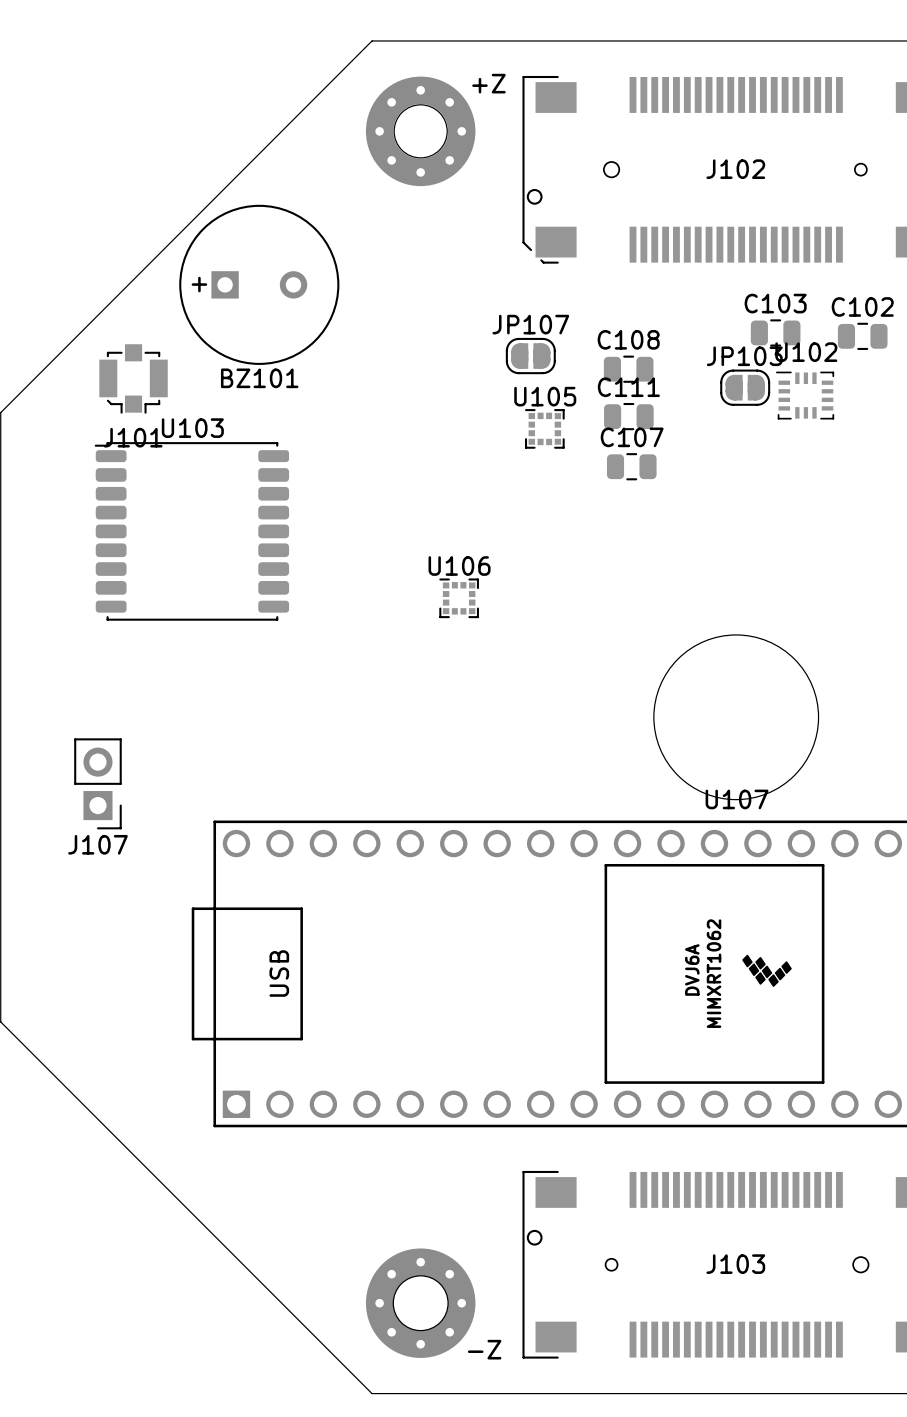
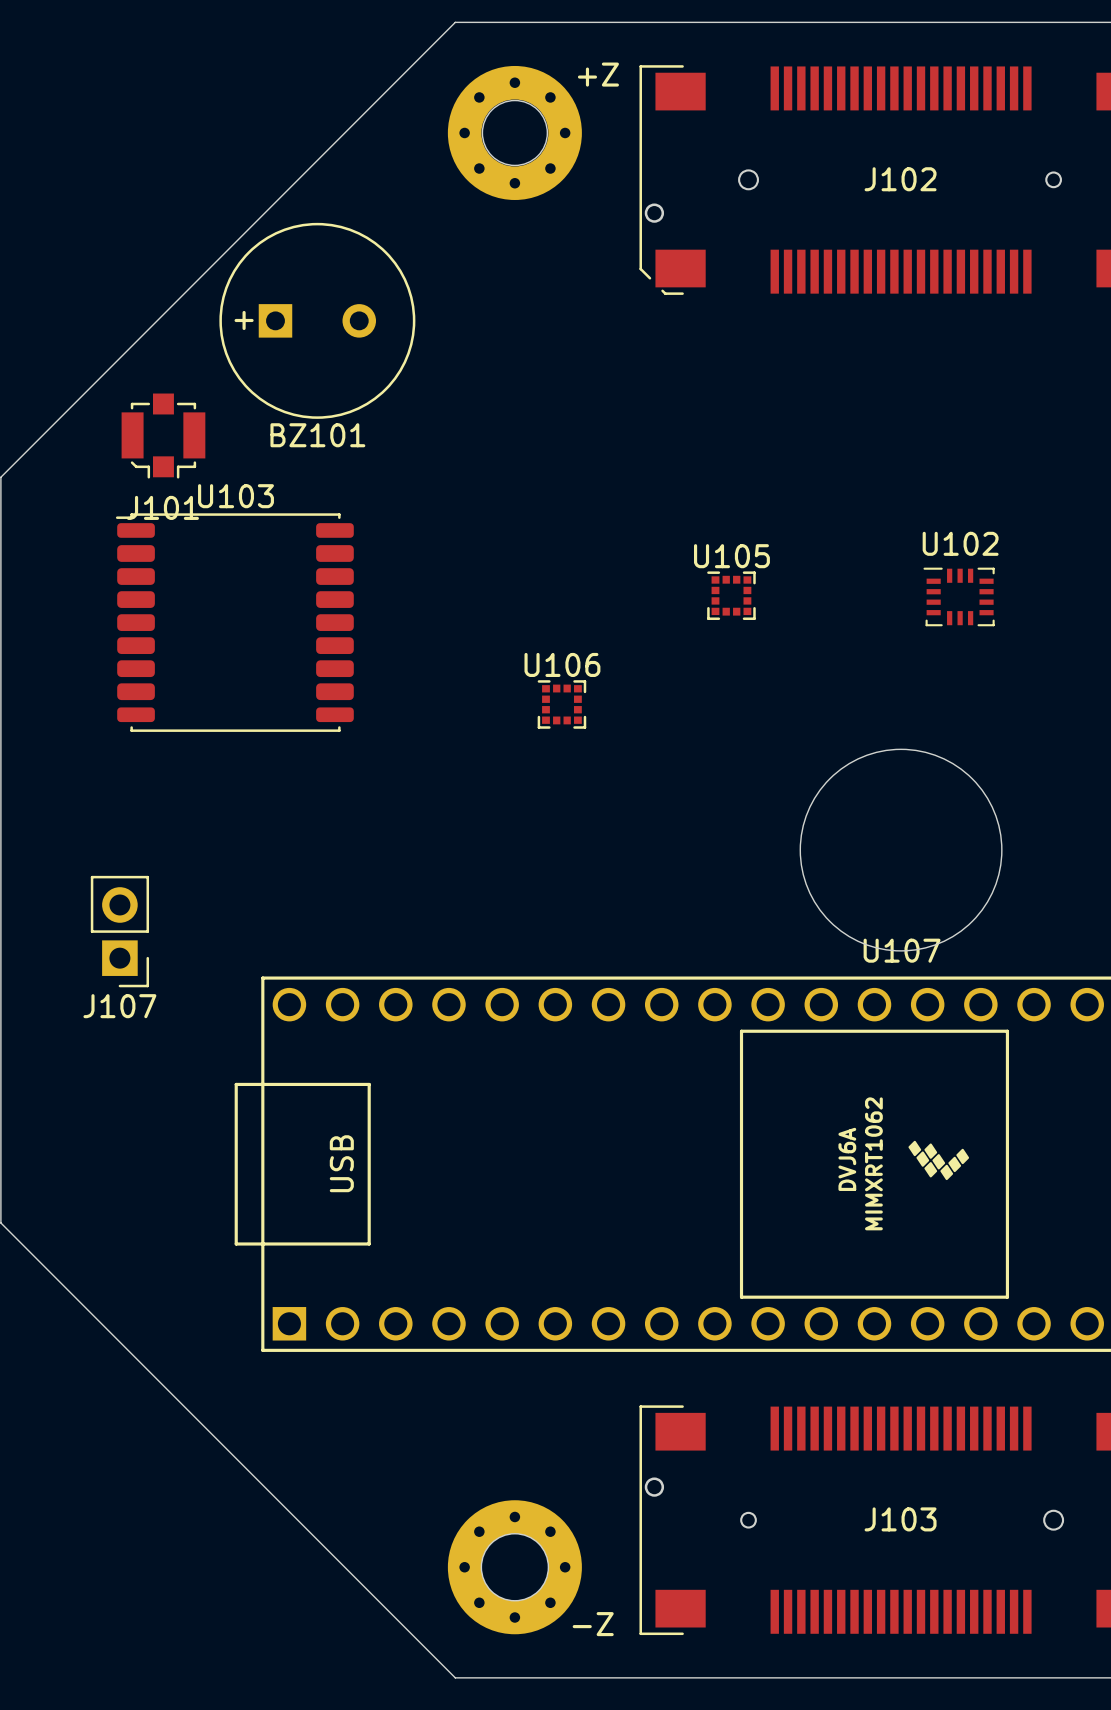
C103: (775, 332) -> none
C102: (862, 336) -> none
JP107: (530, 356) -> none
C108: (628, 369) -> none
JP103: (745, 387) -> none
U102 position: (805, 395) -> (959, 596)
C111: (628, 416) -> none
U105 position: (544, 428) -> (731, 595)
C107: (631, 466) -> none

